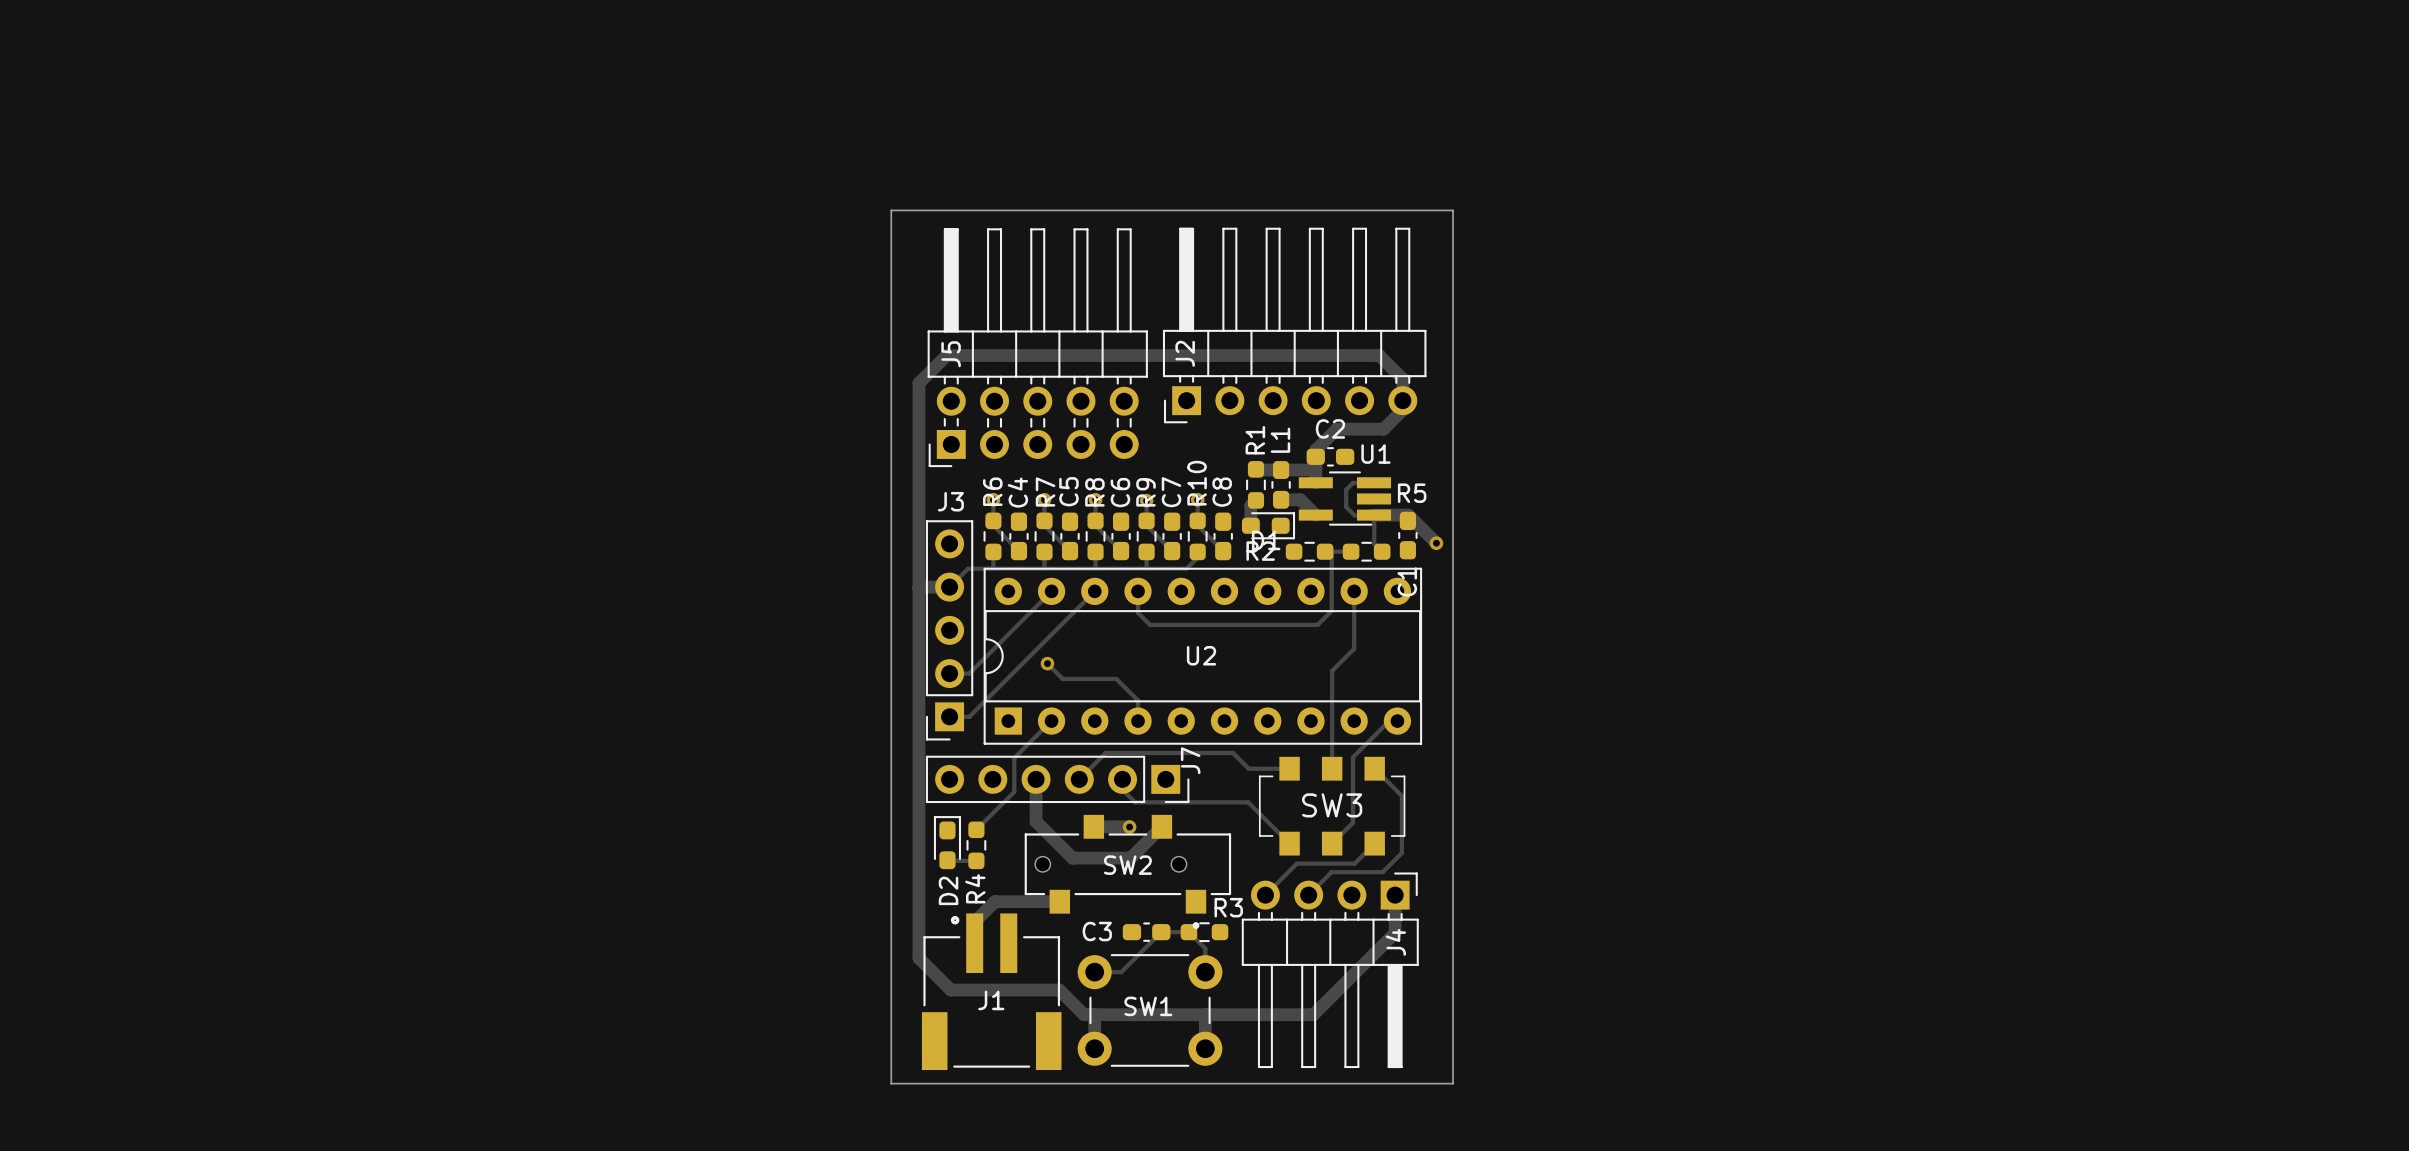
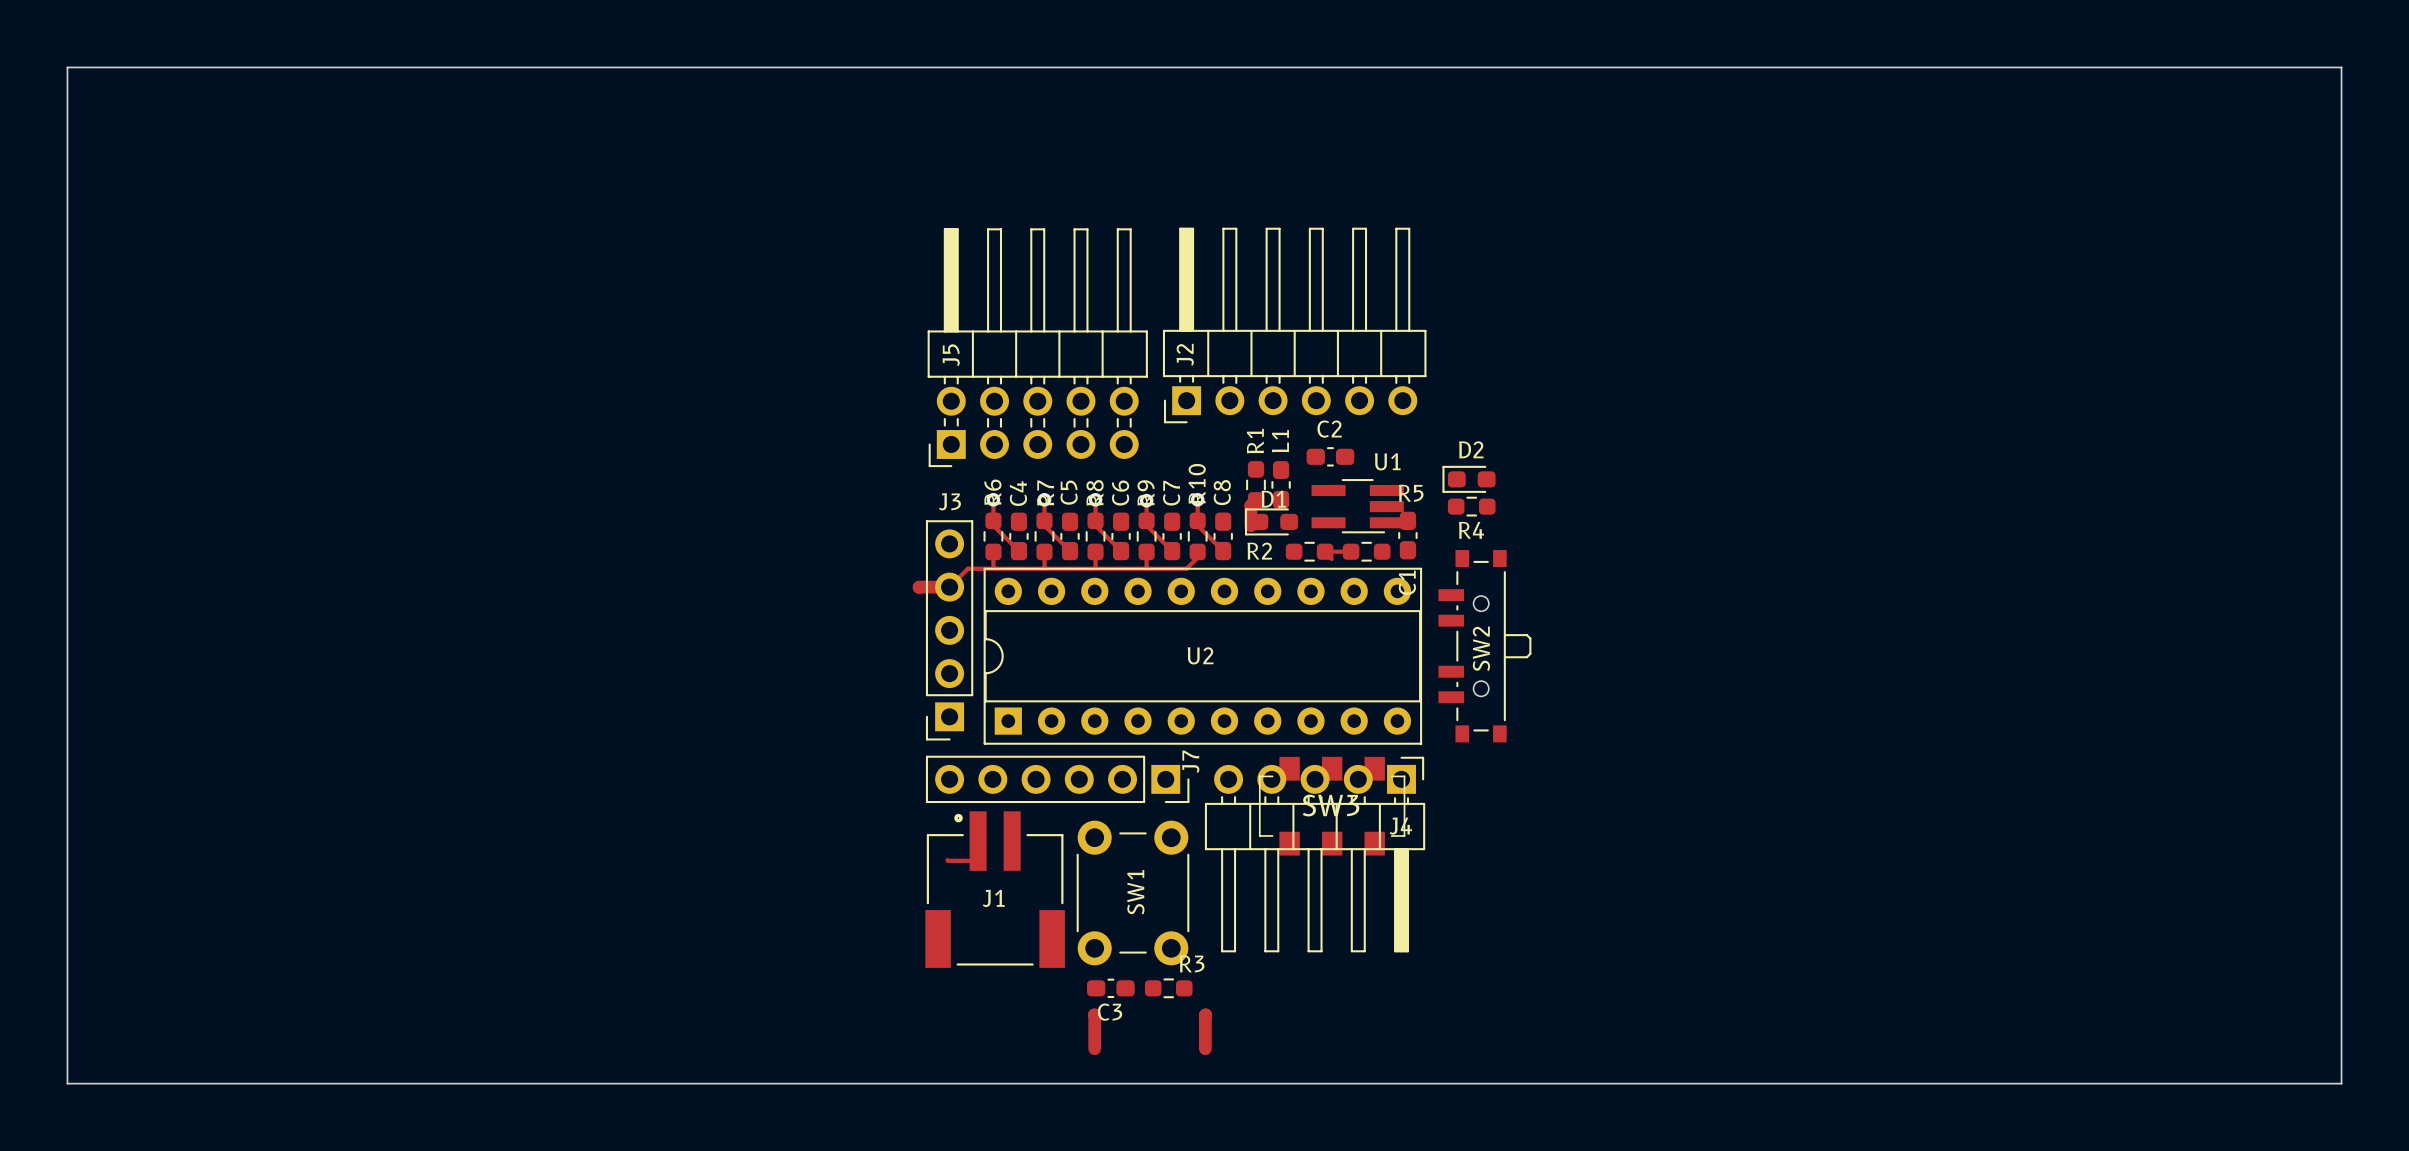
track: (1315, 468) (1314, 470) (1255, 469) -> none
track: (1315, 482) (1315, 450) (1336, 429) (1383, 429) (1402, 410) (1402, 378) (1379, 355) (946, 355) (918, 383) (918, 958) (950, 990) (1059, 990) (1084, 1014) (1313, 1014) (1395, 933) (1395, 895) -> none
track: (1373, 482) (1353, 482) (1346, 489) (1346, 507) (1354, 515) (1373, 515) -> none
U1 position: (1344, 498) -> (1357, 506)
track: (1281, 499) (1300, 499) (1315, 515) -> none
D1 rotation: 0° (1268, 525) -> 180° (1271, 521)
track: (1436, 543) (1408, 515) (1374, 515) (1374, 543) (1382, 551) -> none
via: (1436, 543) -> none
track: (1331, 552) (1331, 610) (1317, 624) (1150, 624) (1138, 612) (1138, 591) -> none
track: (1051, 591) (969, 673) (949, 673) -> none
track: (1094, 591) (969, 716) (949, 716) -> none
track: (1354, 591) (1354, 648) (1332, 670) (1332, 768) -> none
track: (1047, 663) (1062, 678) (1116, 678) (1138, 700) (1138, 721) -> none
via: (1047, 663) -> none
track: (1051, 721) (1014, 758) (1014, 791) (976, 829) -> none
track: (1397, 721) (1389, 721) (1353, 757) (1353, 822) (1332, 843) -> none
track: (1289, 768) (1248, 768) (1233, 752) (1105, 752) (1079, 779) -> none
track: (1374, 768) (1401, 795) (1401, 852) (1382, 872) (1331, 872) (1308, 895) -> none
track: (1036, 779) (1036, 821) (1072, 858) (1130, 858) (1161, 826) -> none
track: (1122, 779) (1122, 789) (1135, 802) (1248, 802) (1289, 843) -> none
SW2 footprint: [1024, 814, 1232, 929] -> [1438, 550, 1532, 743]
track: (1093, 826) (1129, 826) -> none
via: (1129, 827) -> none
D2 rotation: 0° (947, 842) -> 90° counterclockwise (1469, 479)
D2 position: (947, 842) -> (1469, 479)
track: (1374, 843) (1354, 863) (1296, 863) (1265, 895) -> none
R4 rotation: 0° (976, 845) -> 90° clockwise (1471, 506)
R4 position: (976, 845) -> (1471, 506)
J4 footprint: [1241, 872, 1419, 1069] -> [1204, 756, 1426, 953]
D2 name position: D2 (948, 890) -> D2 (1471, 449)
track: (1059, 901) (994, 901) (974, 921) (974, 943) -> none
C3 name position: C3 (1097, 931) -> C3 (1110, 1012)
C3 position: (1146, 932) -> (1110, 988)
R3 position: (1204, 932) -> (1168, 988)
track: (1094, 972) (1121, 972) (1161, 932) (1188, 932) (1205, 948) (1205, 972) -> none
J1 position: (991, 991) -> (995, 889)
SW1 rotation: 0° (1150, 1010) -> 90° clockwise (1133, 893)
SW1 position: (1150, 1010) -> (1133, 893)
board edge: (891, 1083) (891, 210) (1453, 210) (1453, 1083) -> (891, 1083) (67, 1083) (67, 67) (2341, 67) (2341, 1083) (1453, 1083)

